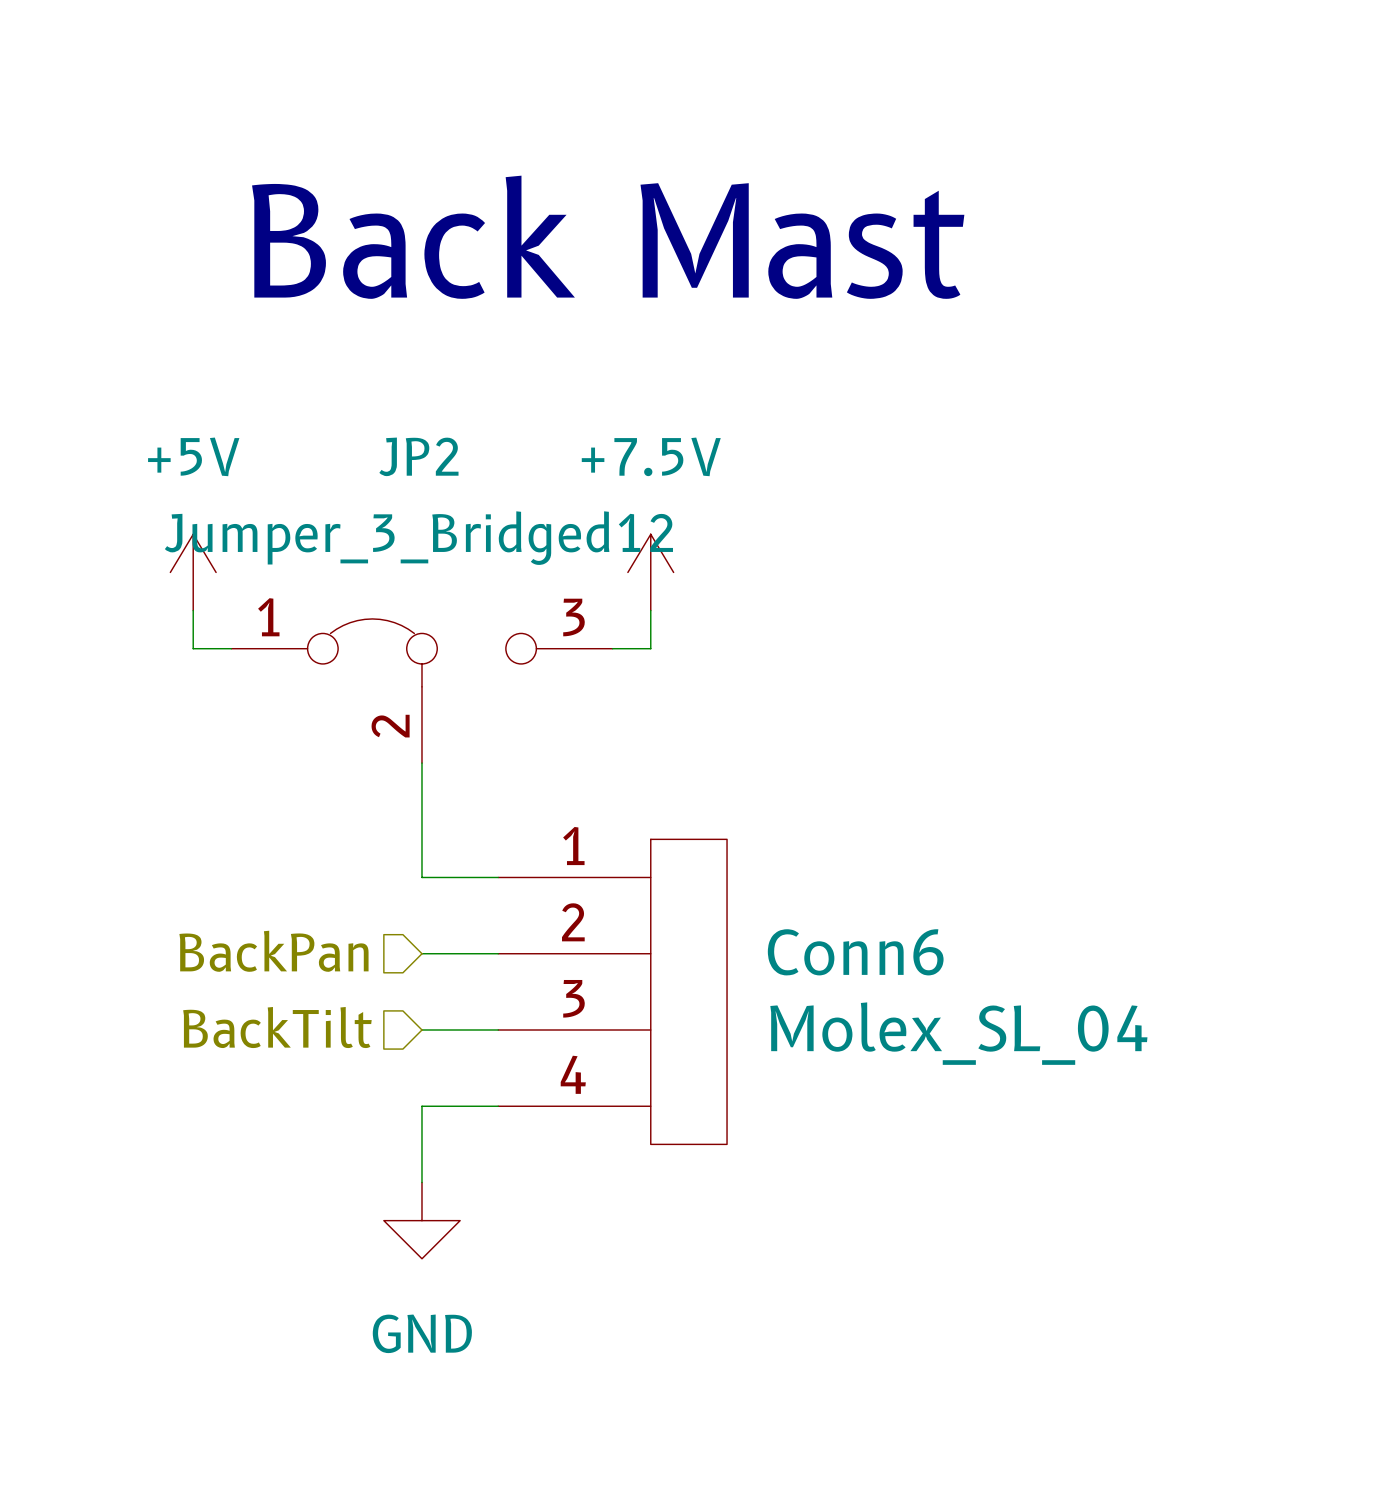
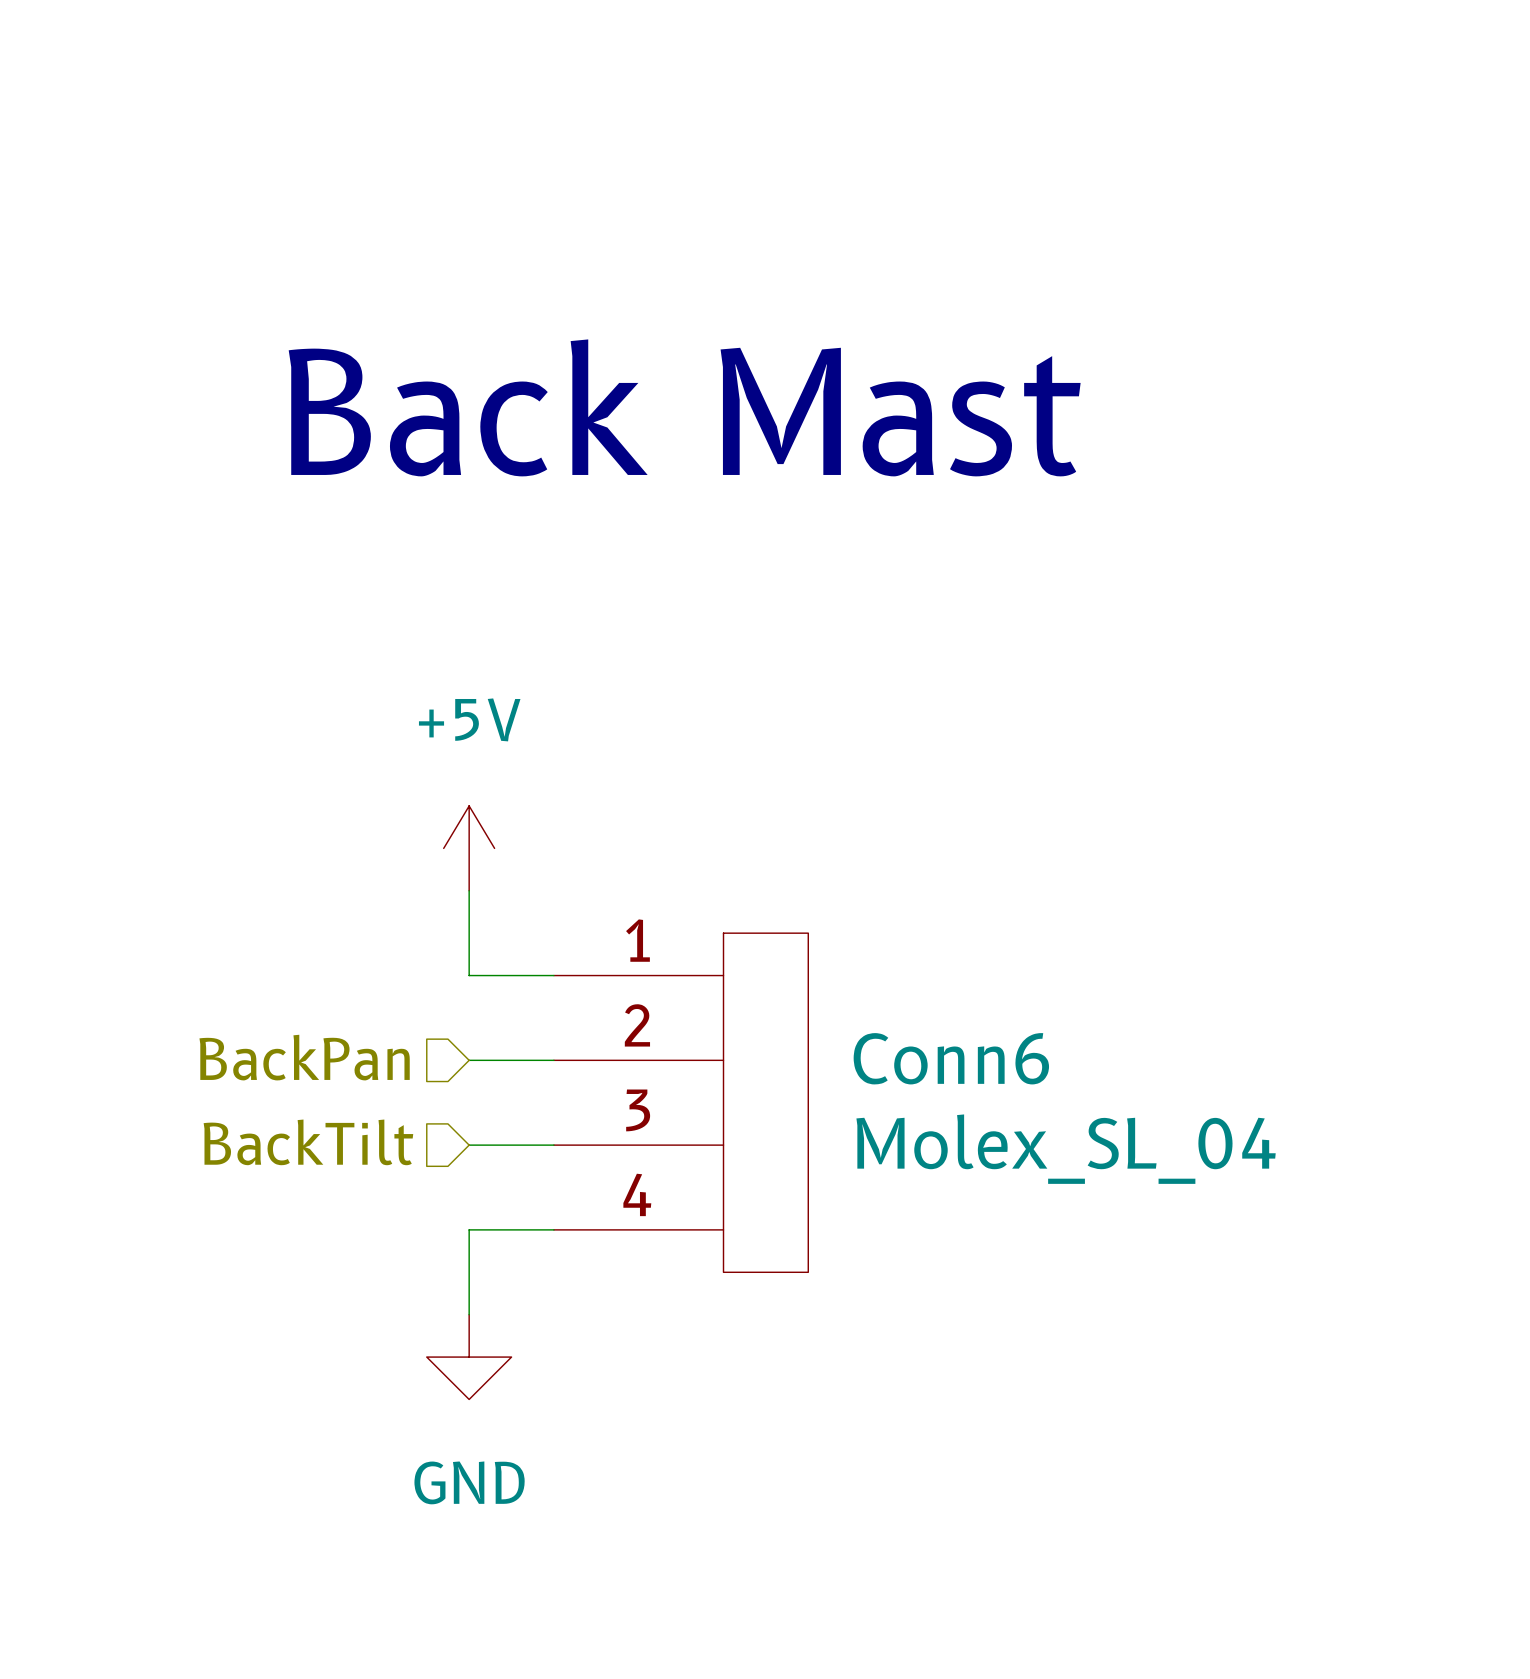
text position: Back Mast (608, 237) -> Back Mast (684, 407)
power symbol position: +5V (193, 572) -> +5V (469, 848)
power symbol: +7.5V (650, 572) -> none
wire: (193, 610) (193, 648) (231, 648) -> none
wire: (650, 610) (650, 648) (612, 648) -> none
JP2: Jumper_3_Bridged12 (421, 691) -> none

